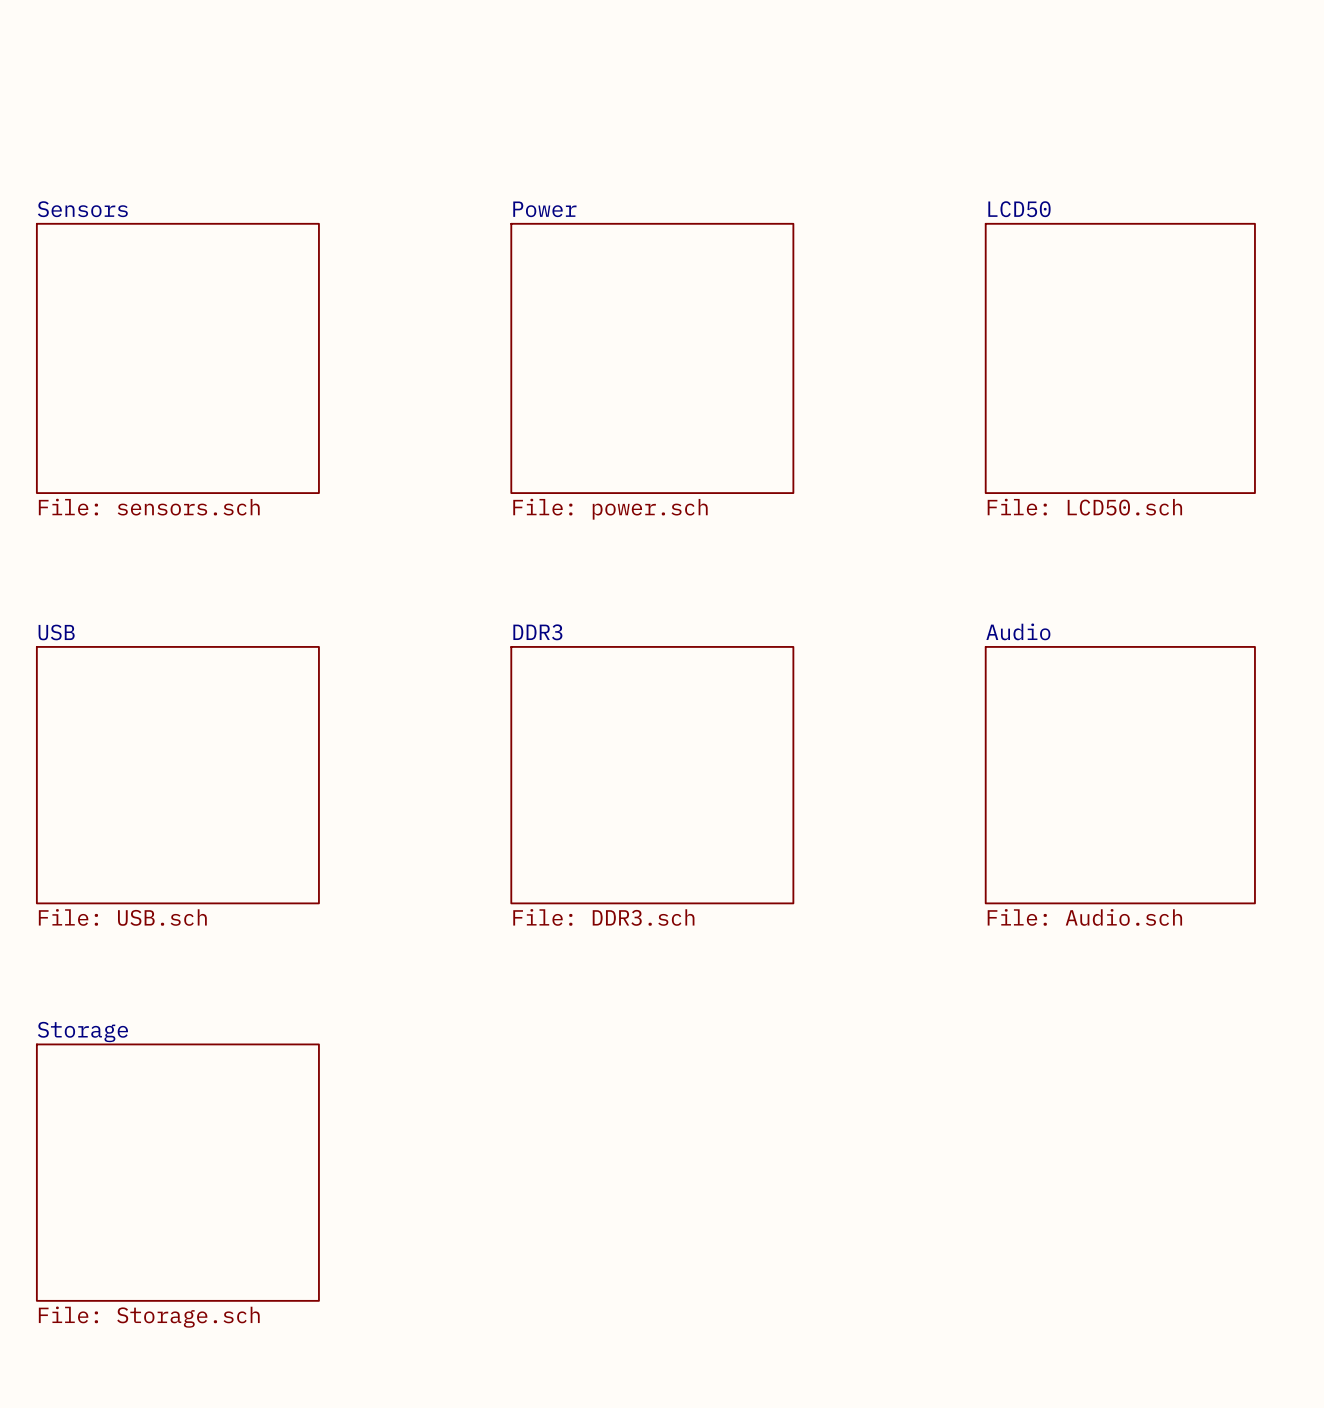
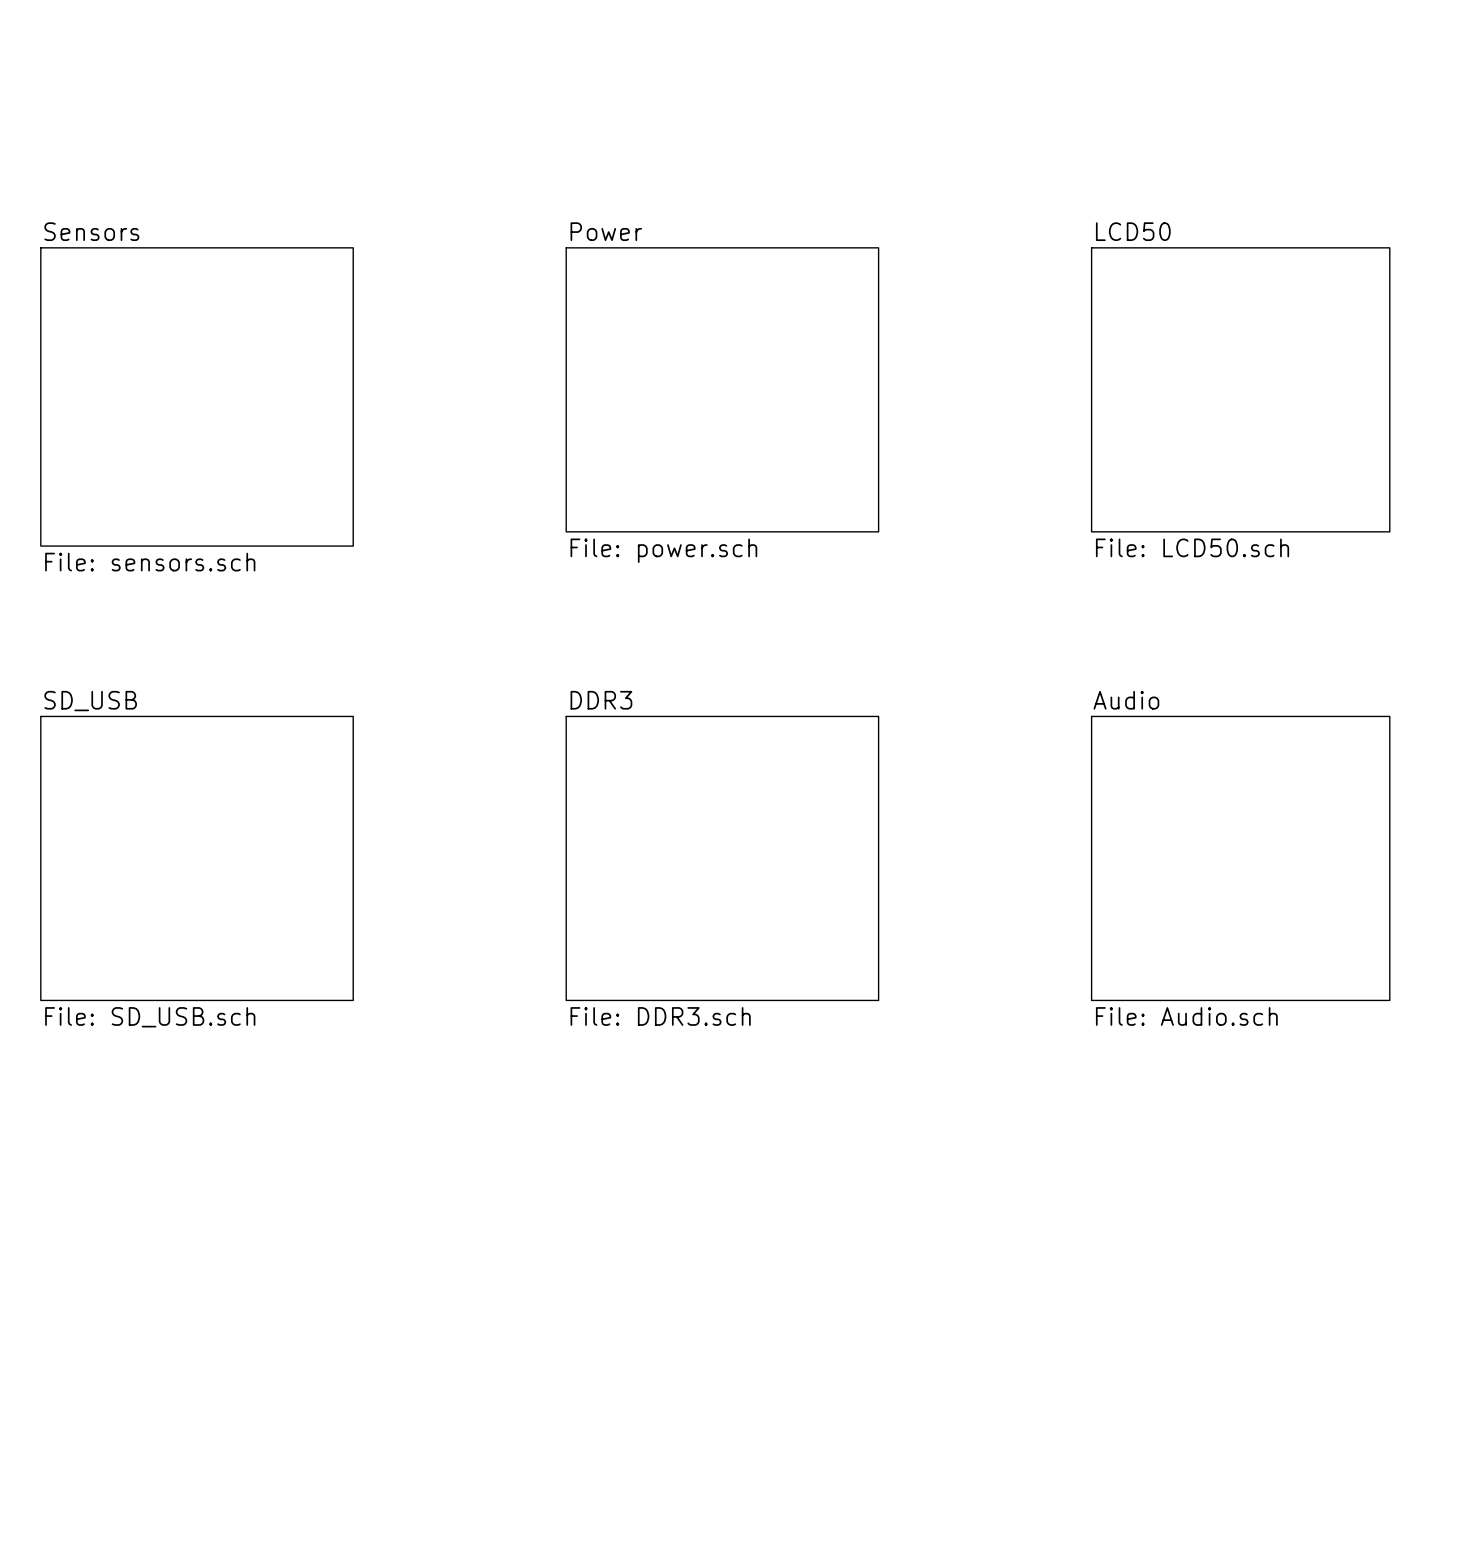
sheet Power shape: [511, 223, 794, 494] -> [566, 247, 879, 532]
sheet LCD50 shape: [985, 223, 1255, 494] -> [1091, 247, 1390, 532]
sheet USB name: USB (56, 632) -> SD_USB (90, 701)
sheet USB value: File: USB.sch (122, 917) -> File: SD_USB.sch (150, 1017)
sheet Storage: File: Storage.sch (177, 1172) -> none

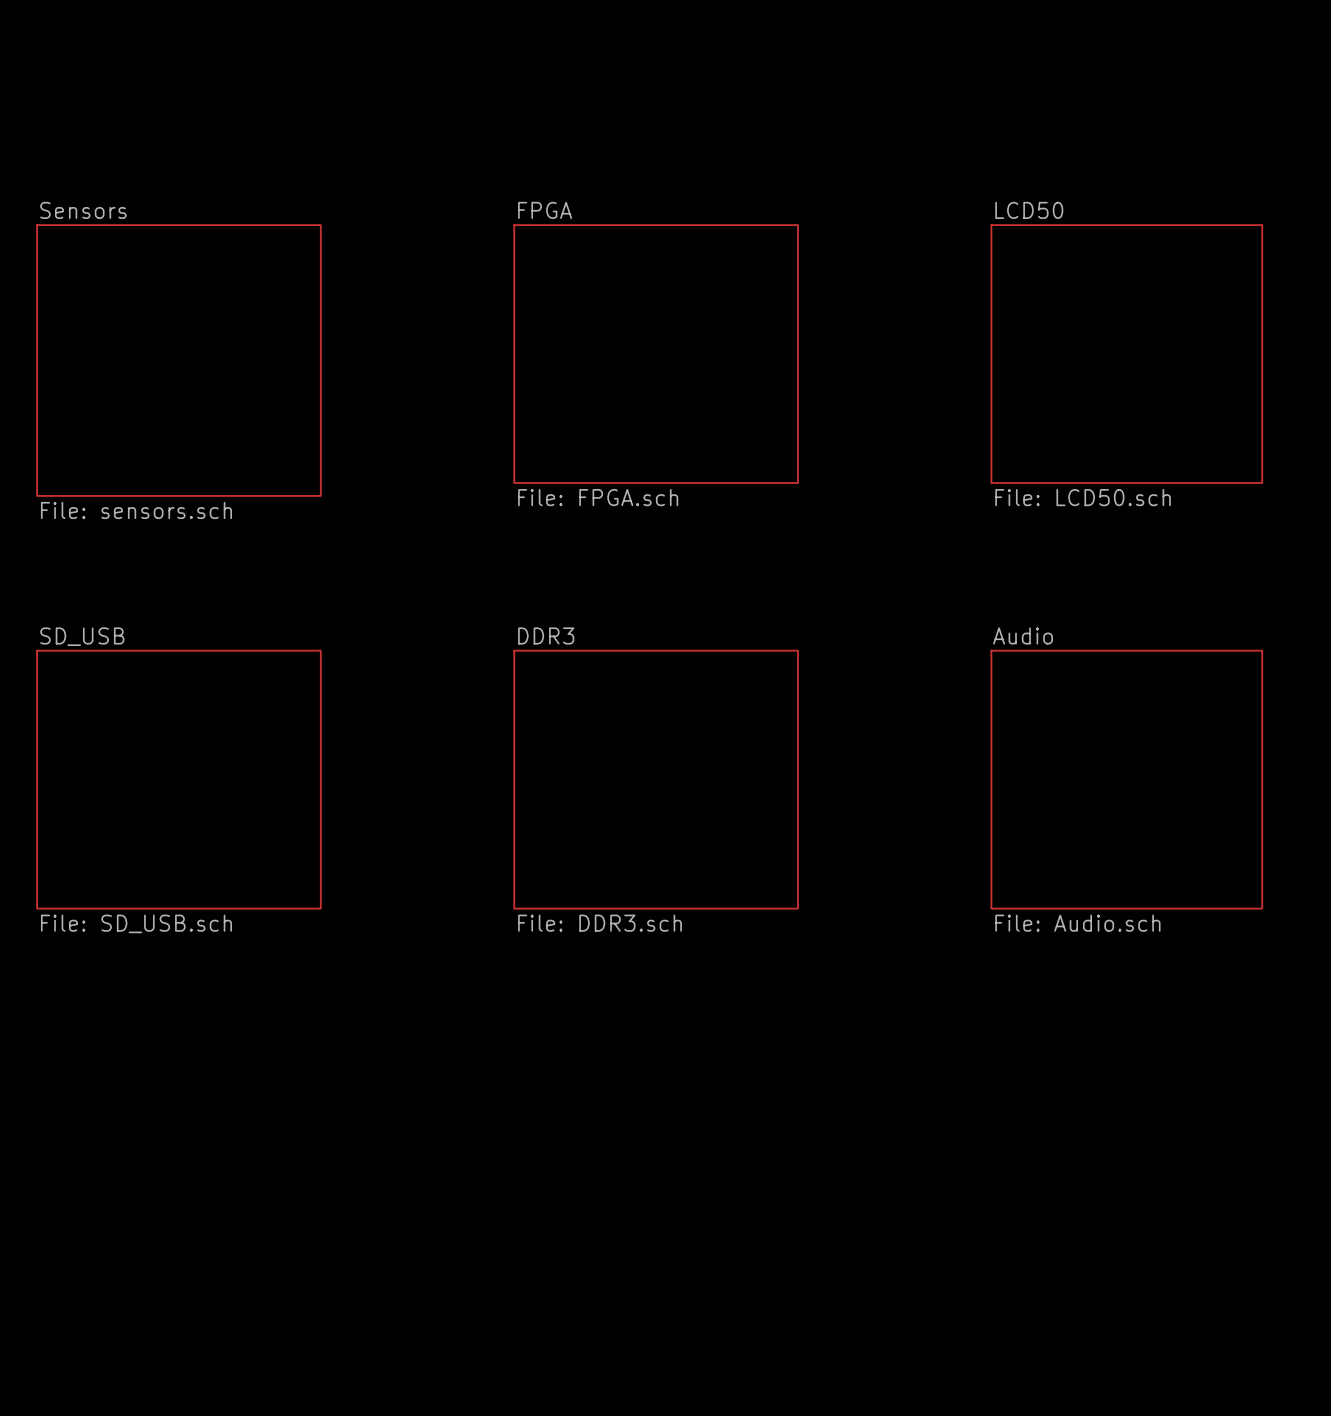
sheet Power name: Power (606, 231) -> FPGA (545, 210)
sheet Power value: File: power.sch (663, 550) -> File: FPGA.sch (598, 497)

